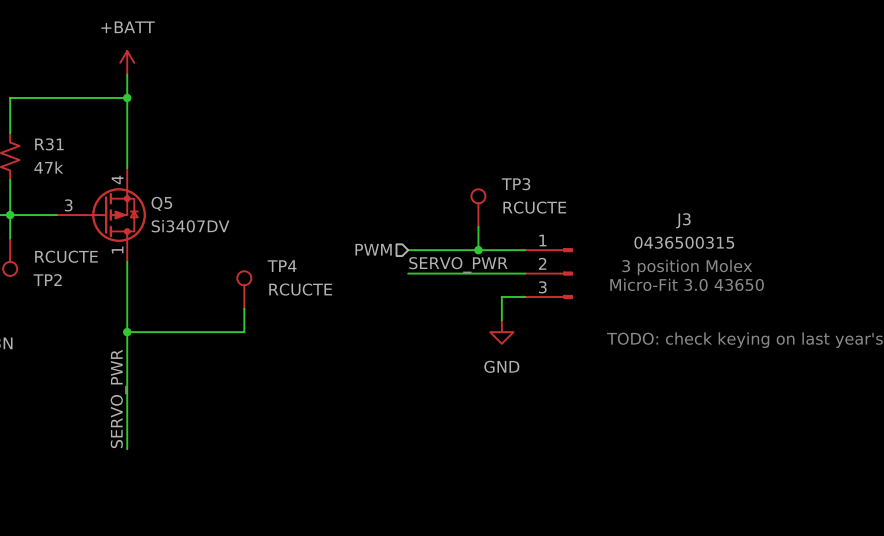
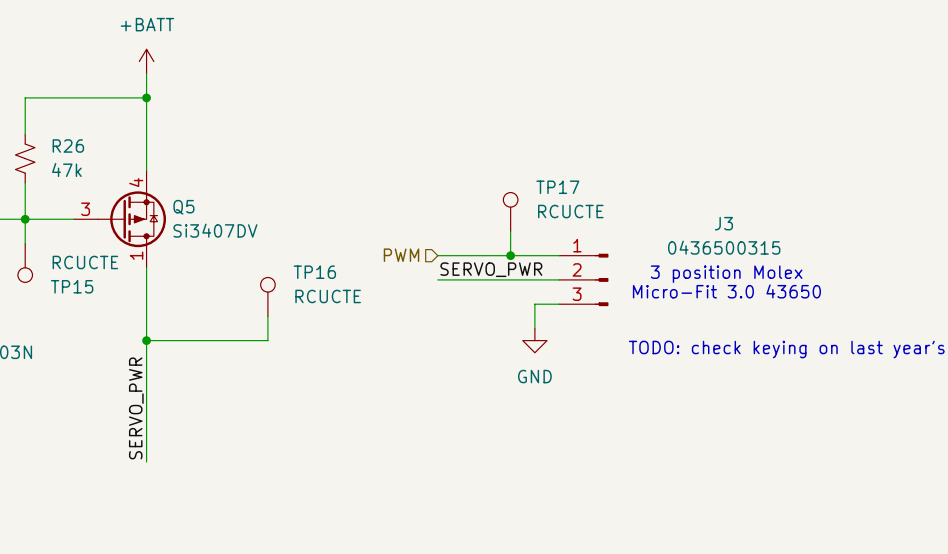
R31 name: R31 (49, 144) -> R26 (68, 145)
TP3 name: TP3 (516, 184) -> TP17 (557, 187)
TP4 name: TP4 (282, 266) -> TP16 (314, 272)
TP2 name: TP2 (47, 280) -> TP15 (72, 286)

